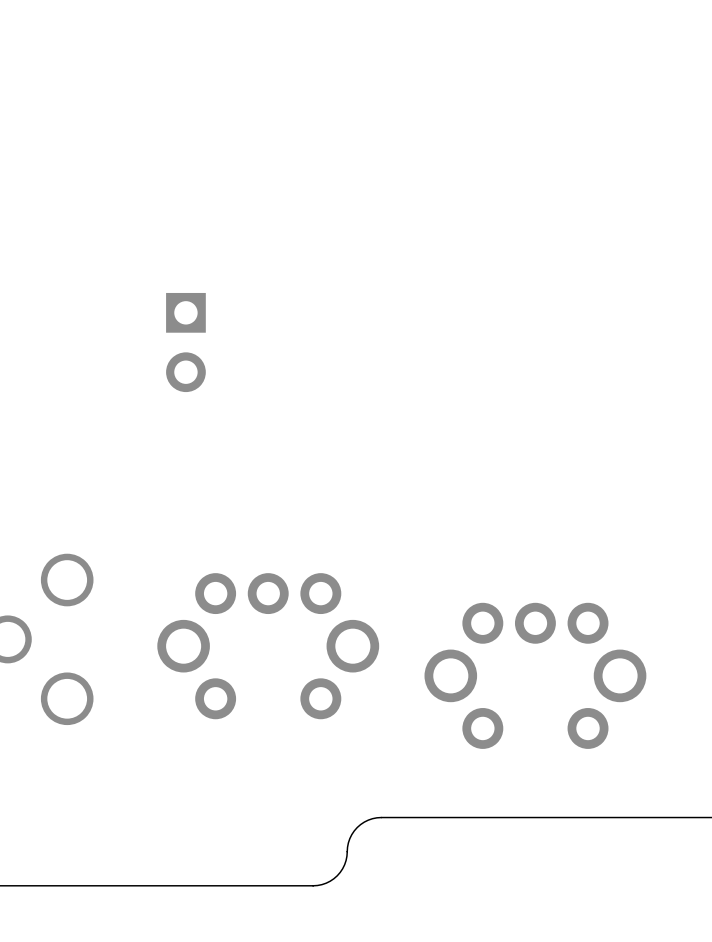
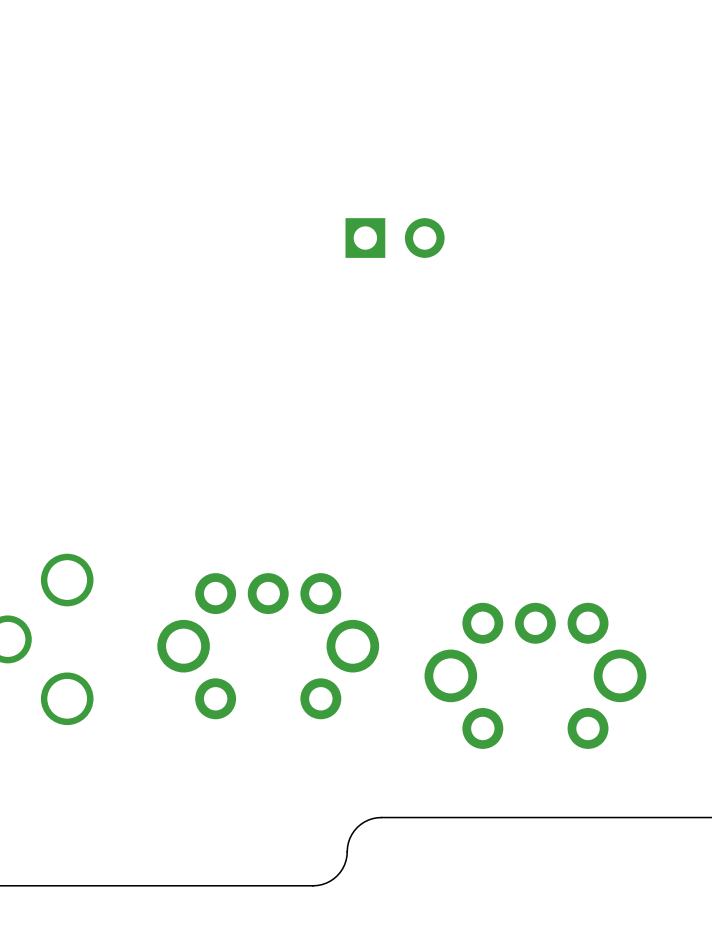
part rotation: 0° (185, 342) -> 90° counterclockwise (395, 238)
part position: (185, 342) -> (395, 238)

